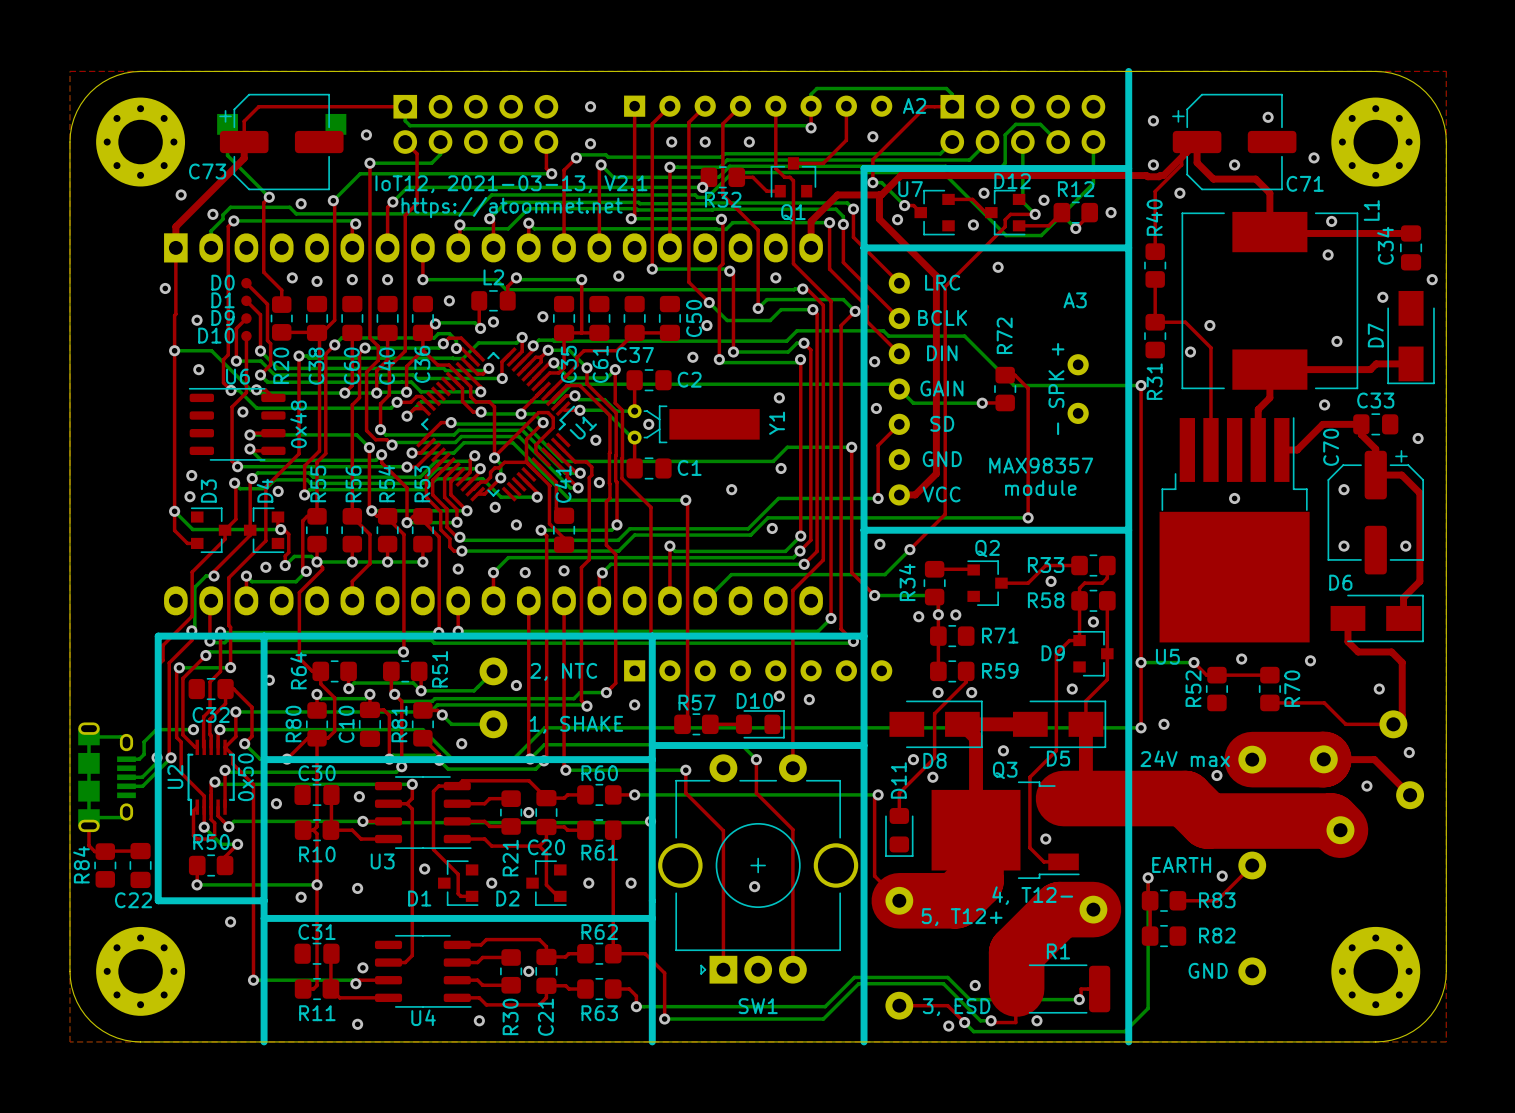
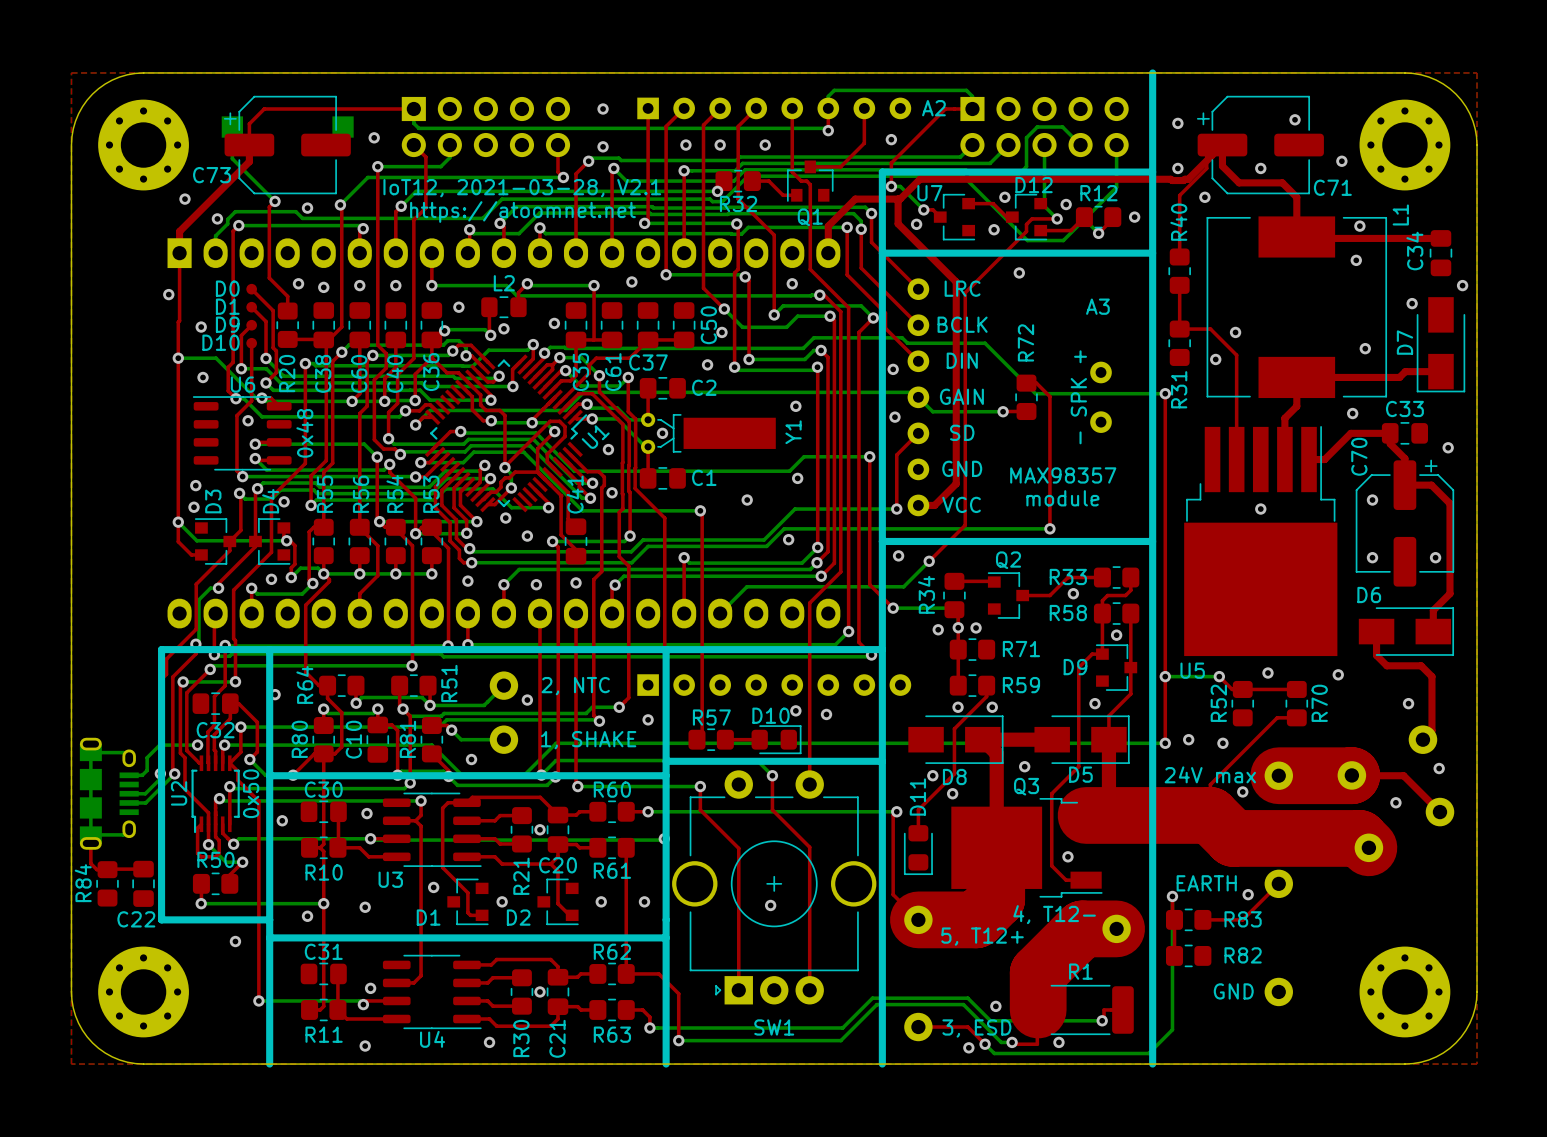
text: IoT12, 2021-03-13, V2.1 (511, 184) -> IoT12, 2021-03-28, V2.1 (522, 188)
top track: (1269, 702) (1324, 702) (1345, 724) (1393, 724) -> (1296, 717) (1277, 717) (1210, 784) (1210, 815)
via: none -> (1222, 743)

